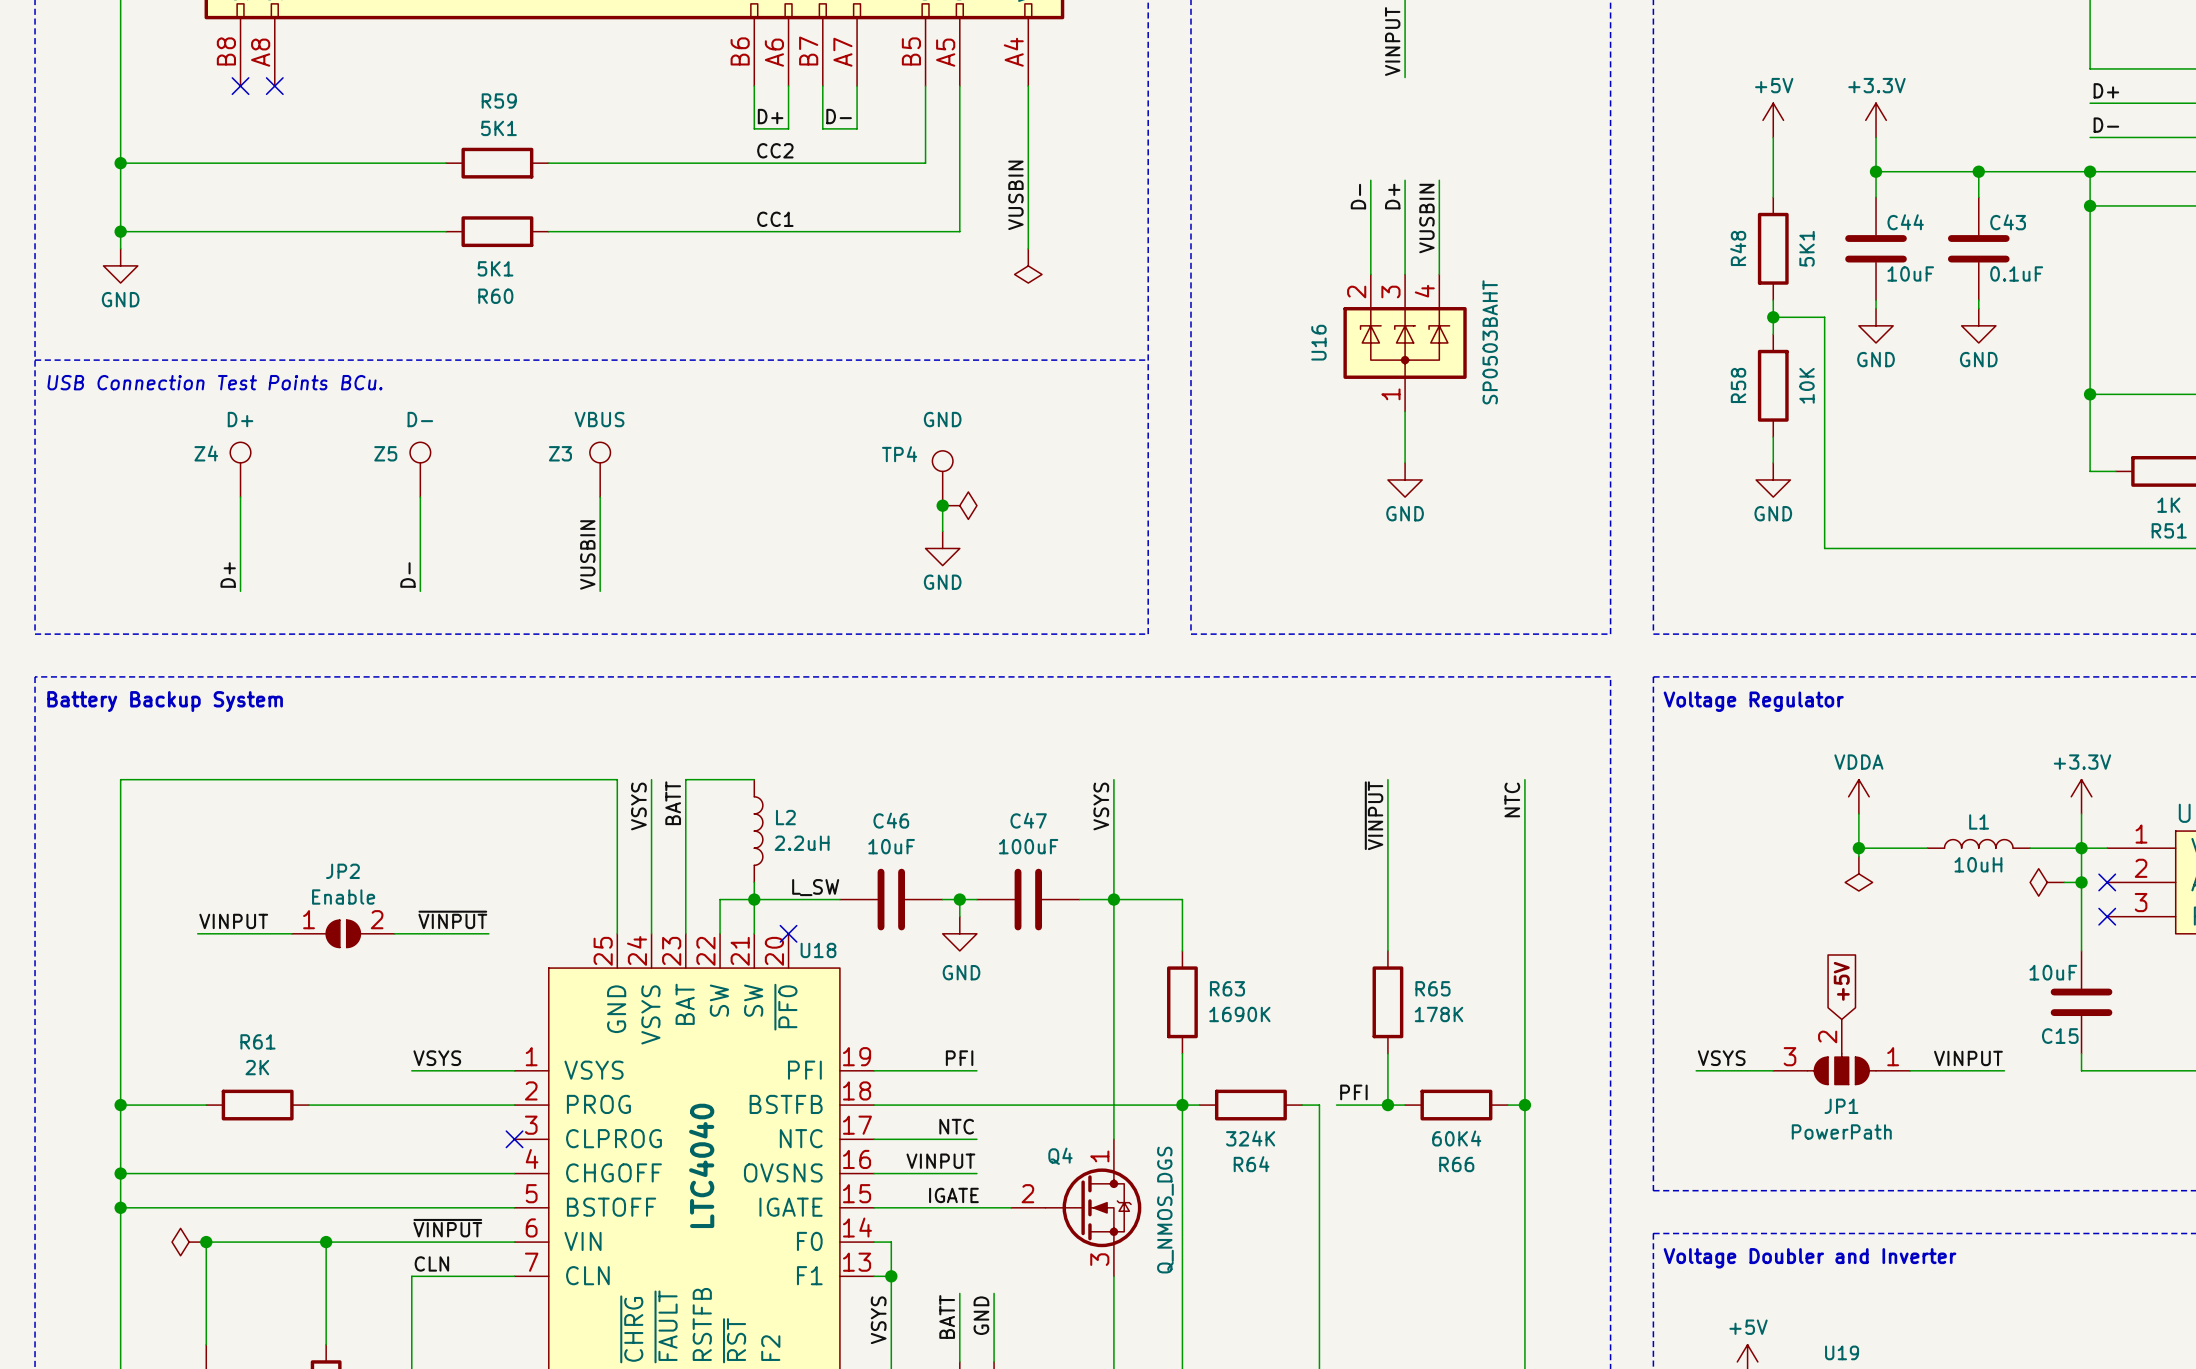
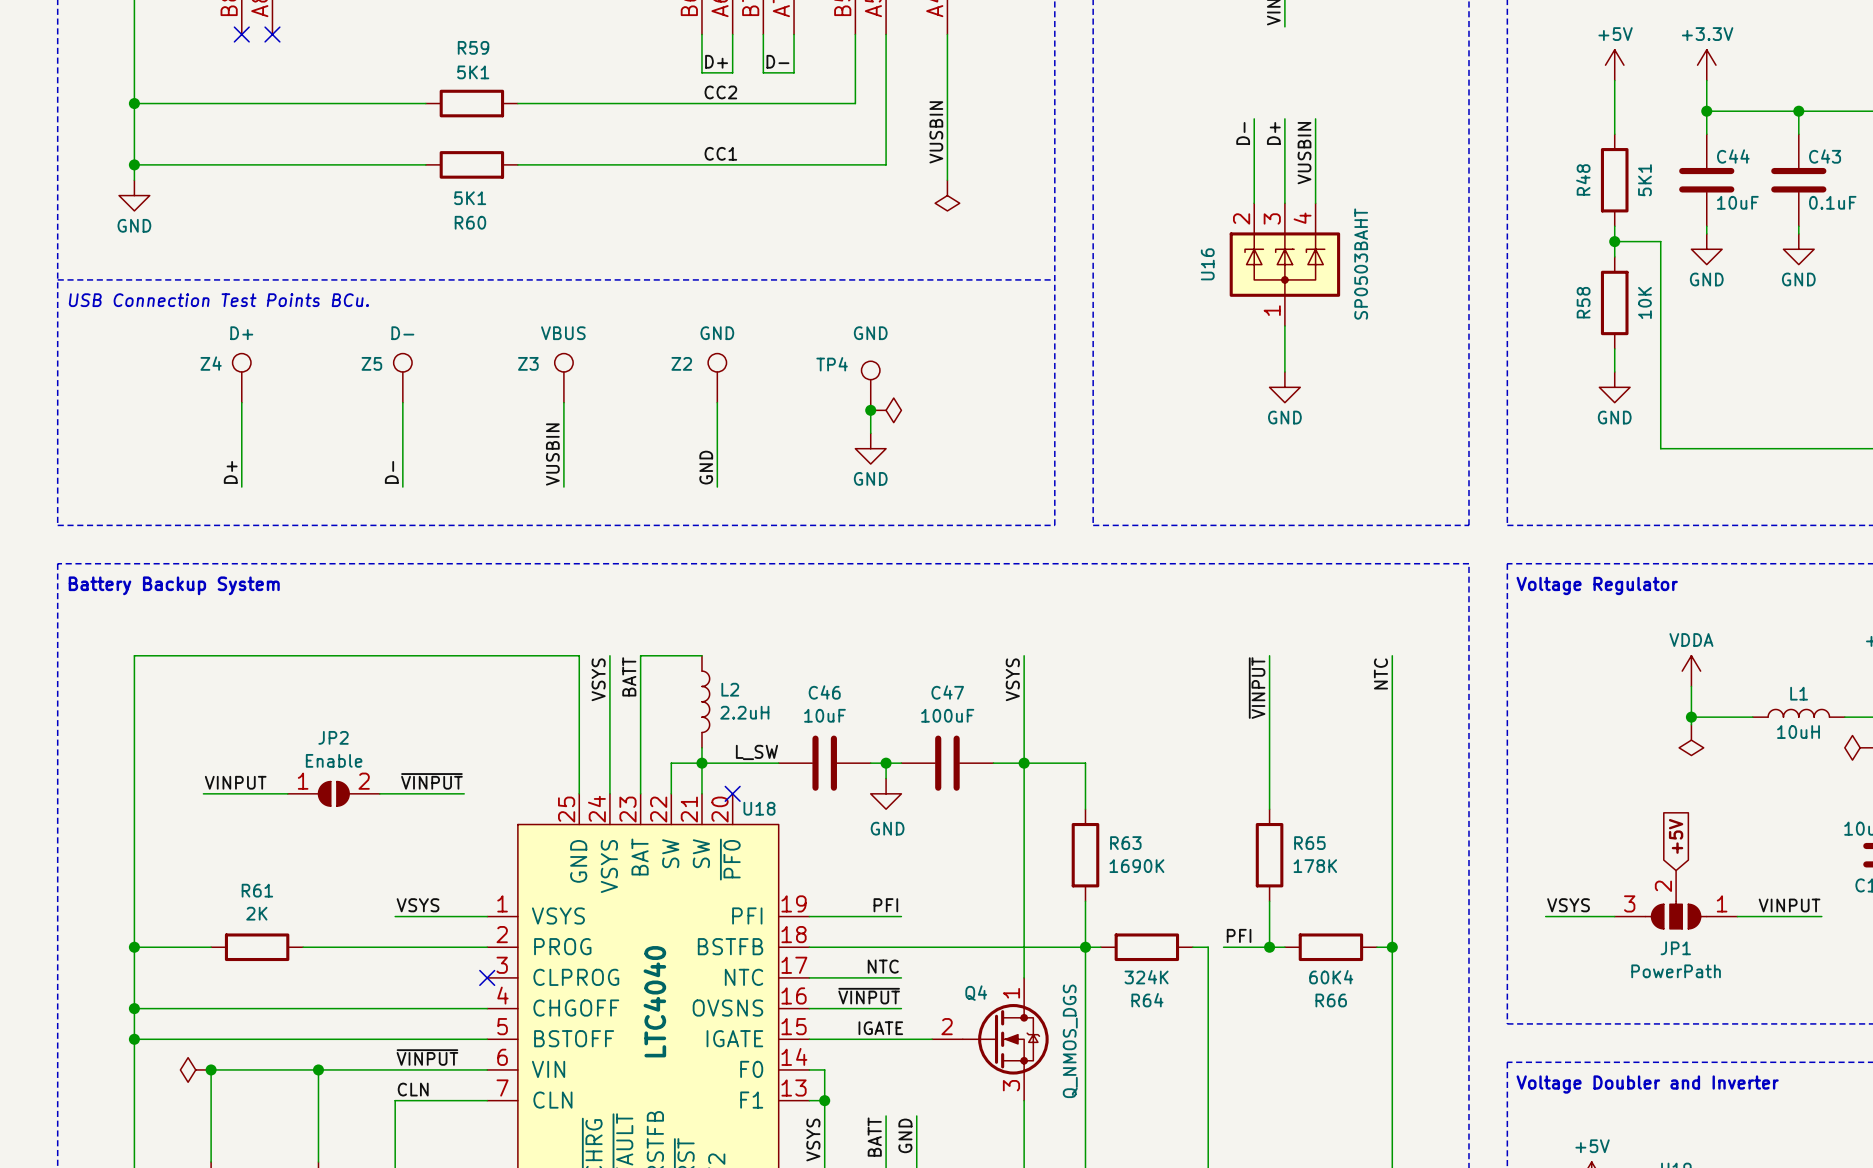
Z2: none -> GND (717, 378)
wire: none -> (717, 402) (717, 487)
label: none -> GND (706, 467)
label: VINPUT (940, 1161) -> ~{VINPUT} (869, 996)

